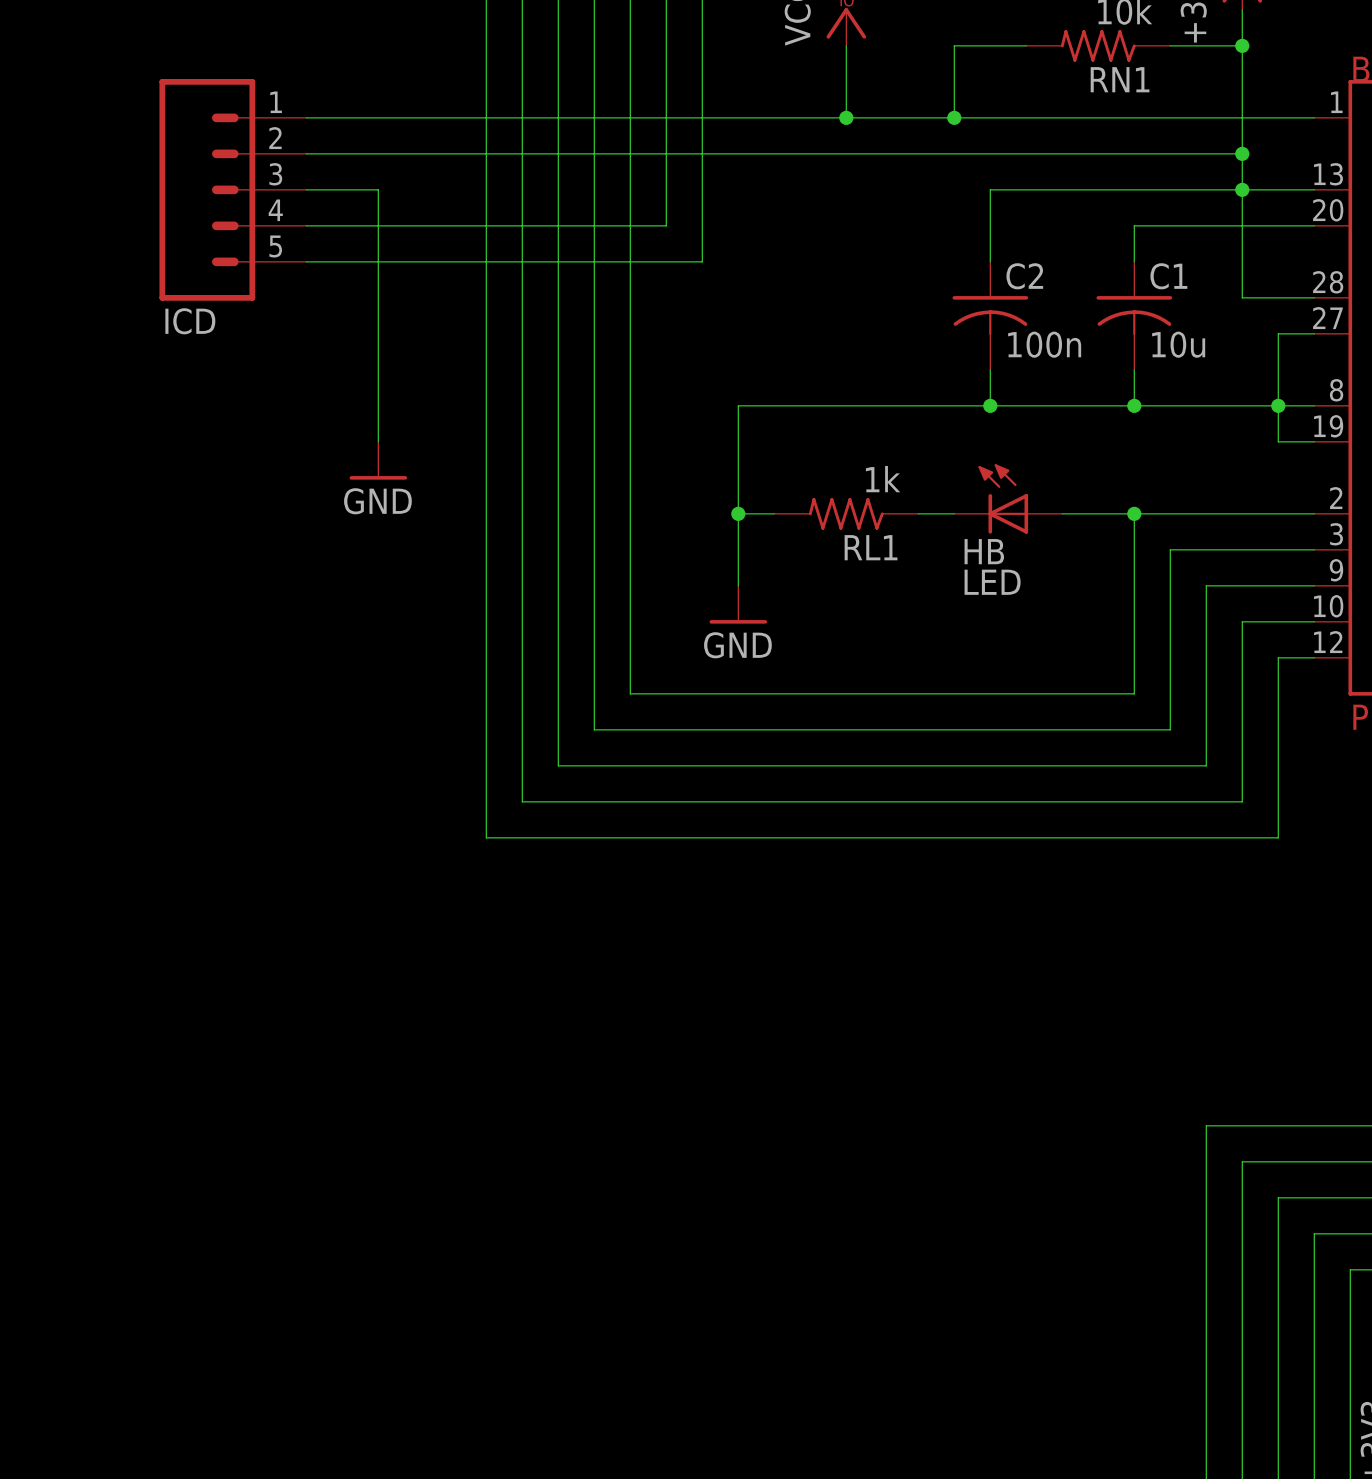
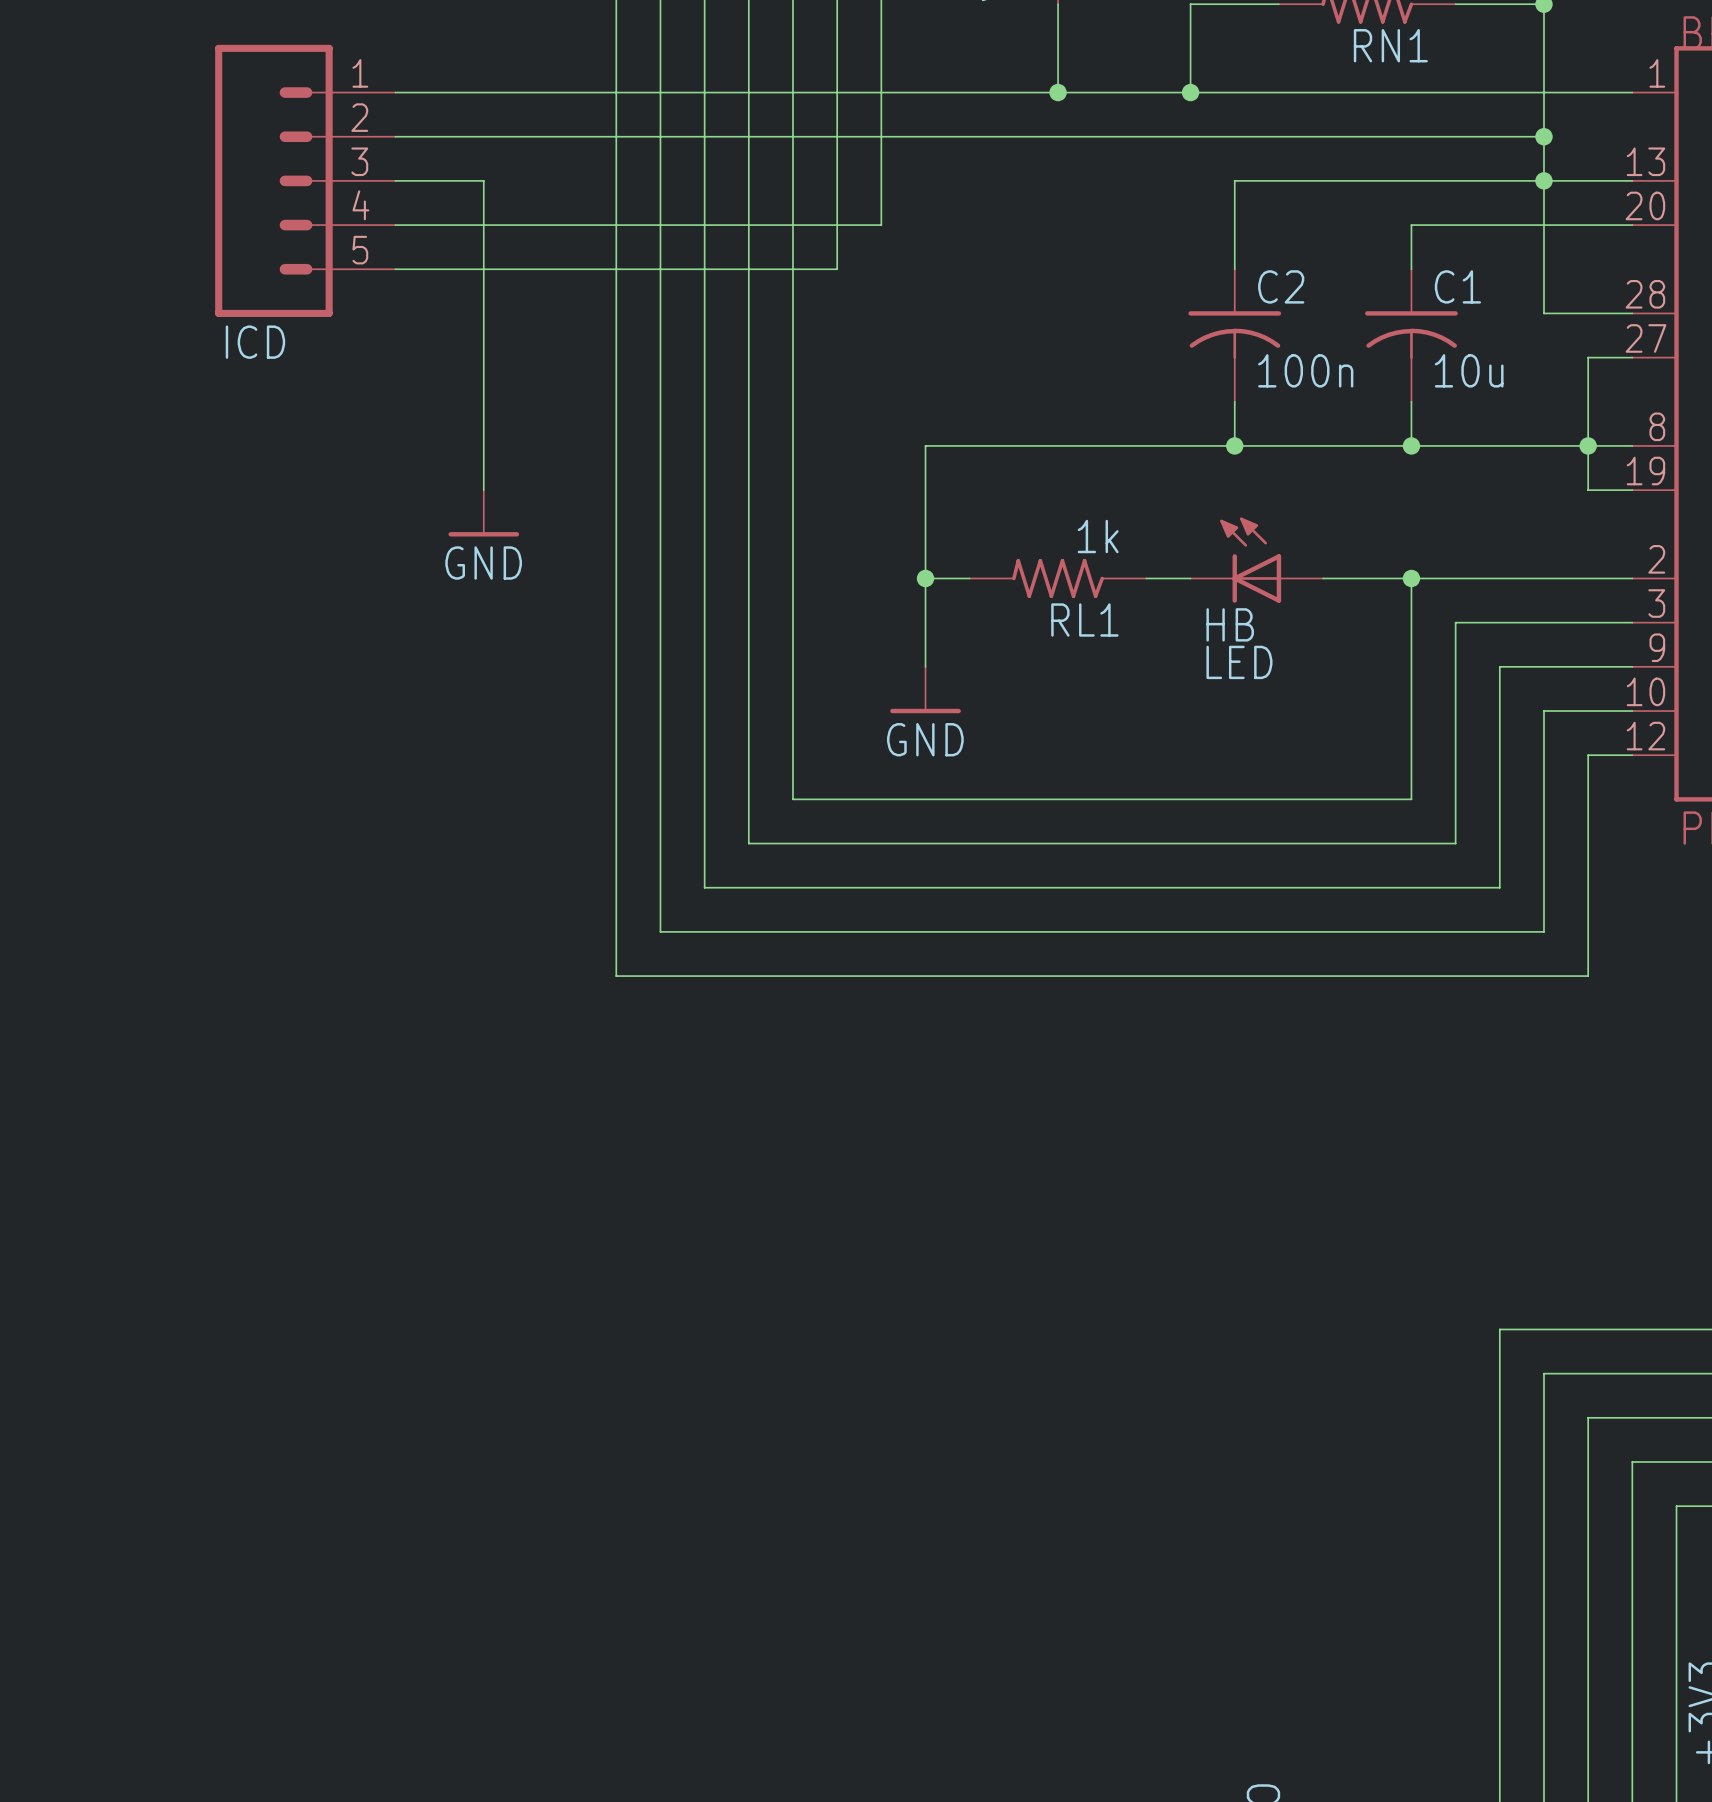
wire: (702, 225) (702, 261) (666, 261) -> (881, 225) (837, 225) (837, 269)

